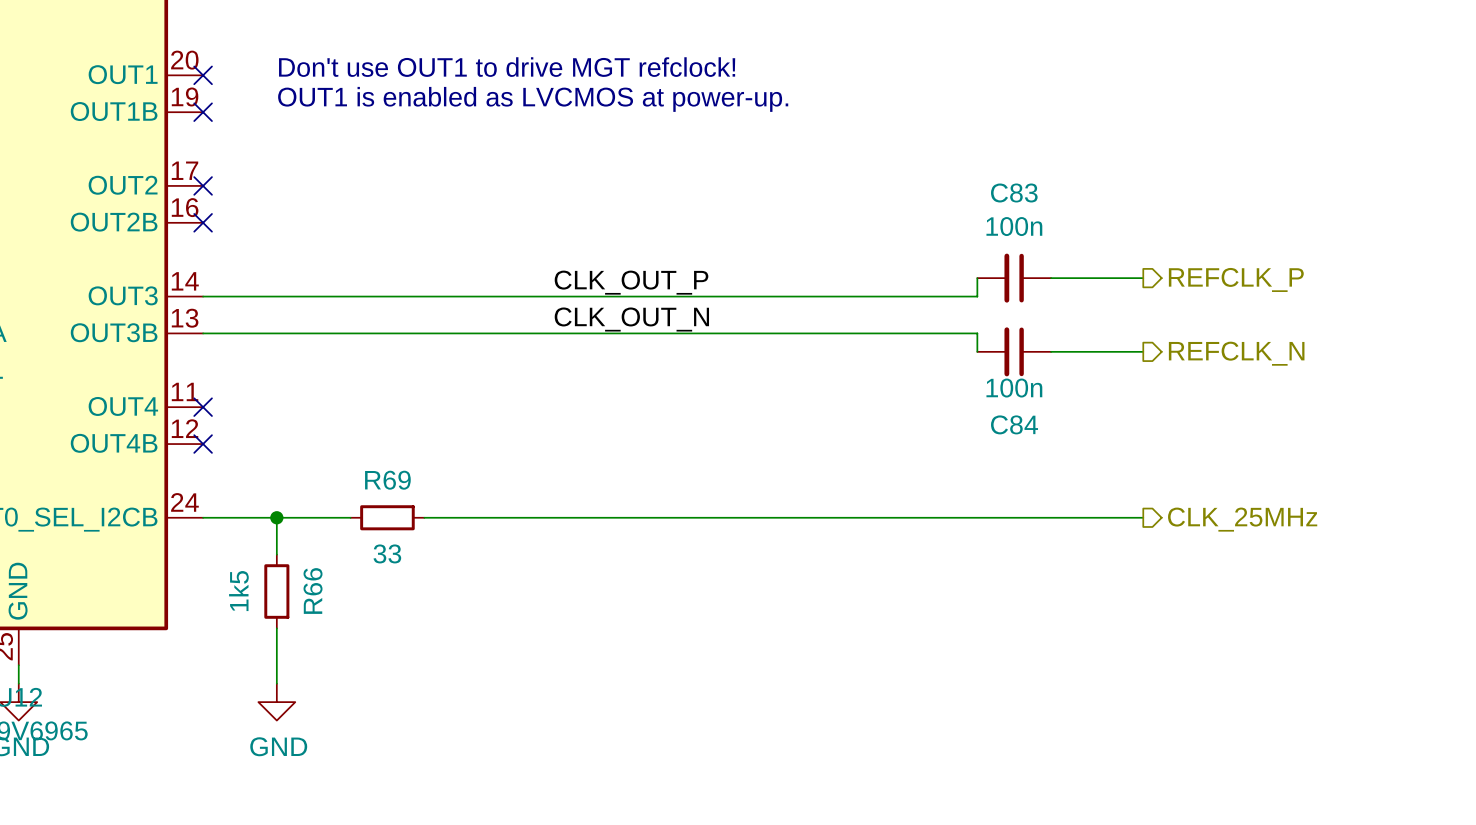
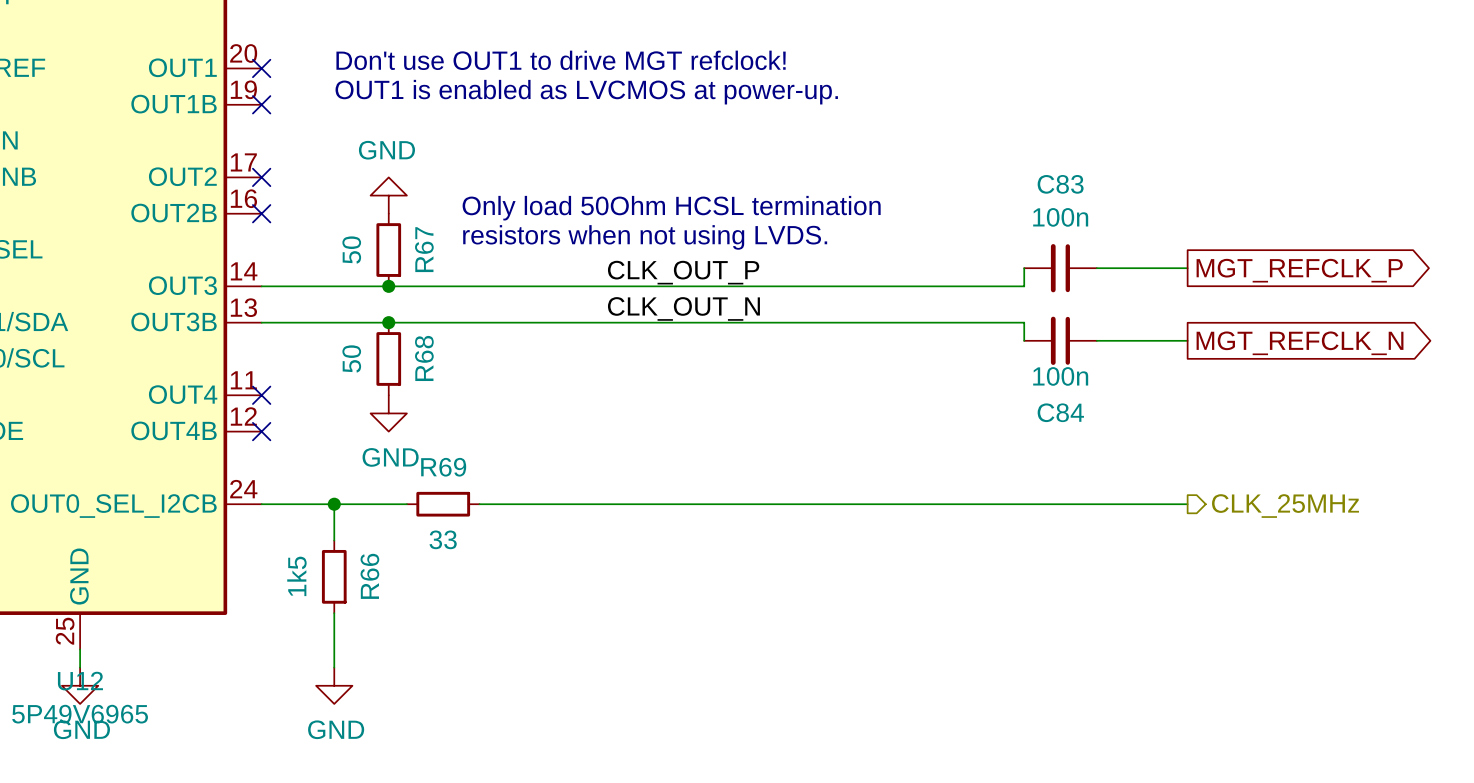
power symbol: none -> GND (388, 195)
text: none -> Only load 50Ohm HCSL termination (671, 208)
text: none -> resistors when not using LVDS. (645, 237)
R67: none -> 50 (388, 250)
hierarchical label: REFCLK_P (1236, 279) -> none
global label: none -> MGT_REFCLK_P (1299, 270)
junction: none -> (388, 286)
junction: none -> (388, 322)
hierarchical label: REFCLK_N (1236, 353) -> none
global label: none -> MGT_REFCLK_N (1300, 343)
R68: none -> 50 (388, 358)
power symbol: none -> GND (388, 413)

